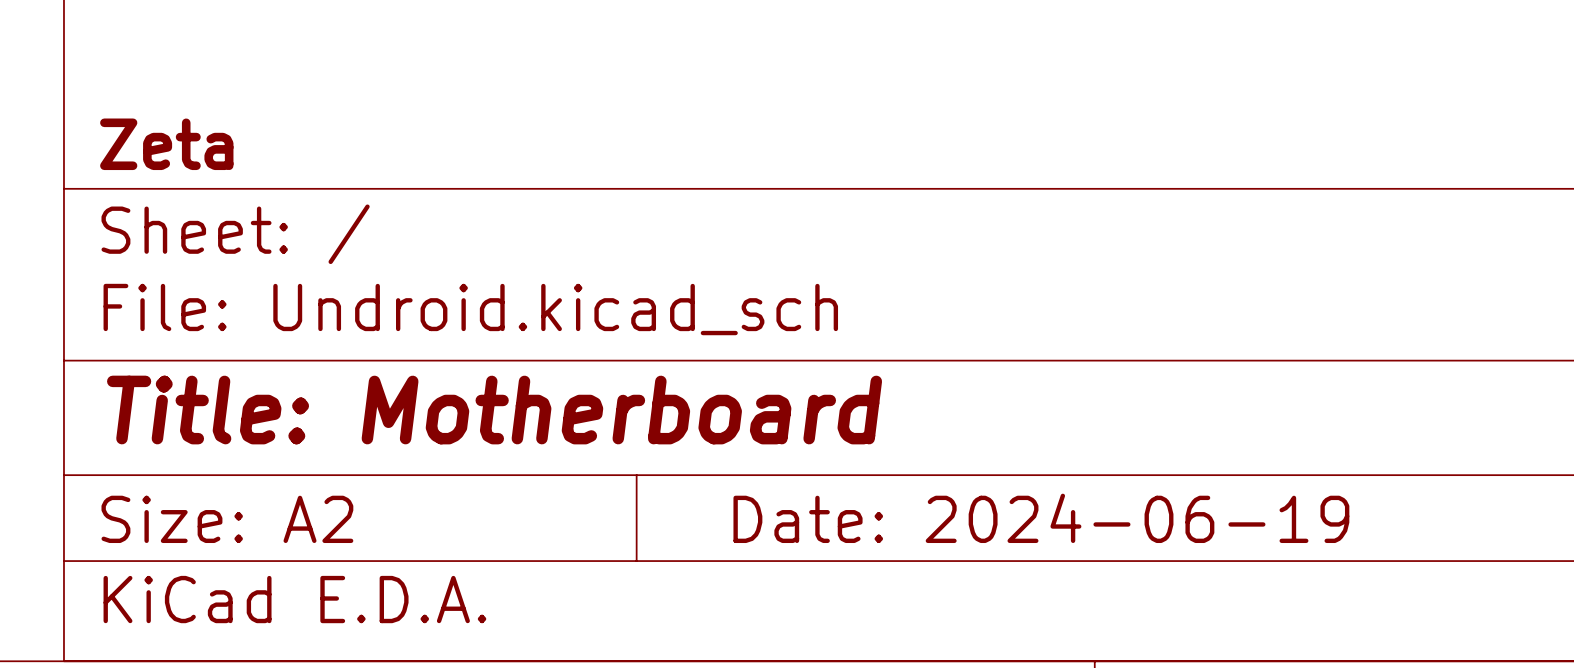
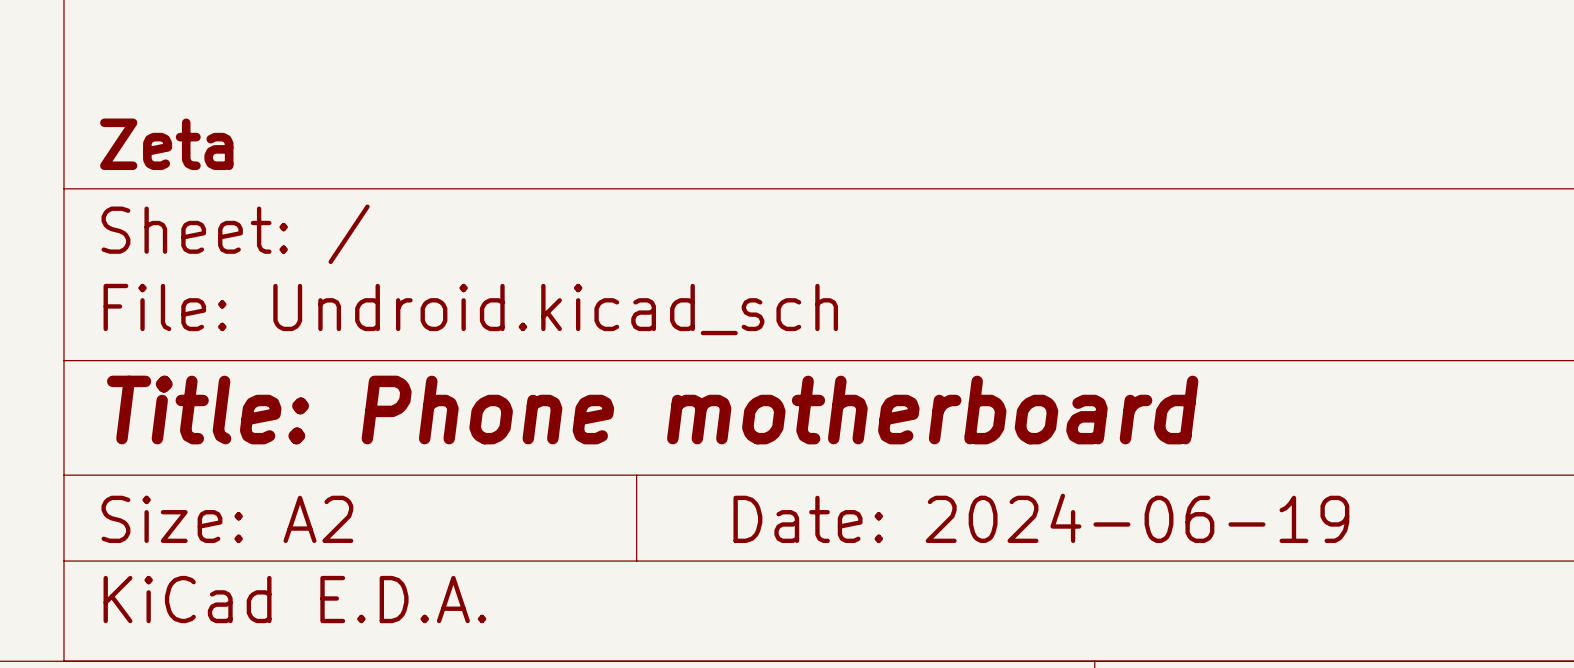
title block: Title: Motherboard (494, 410) -> Title: Phone motherboard (652, 410)

